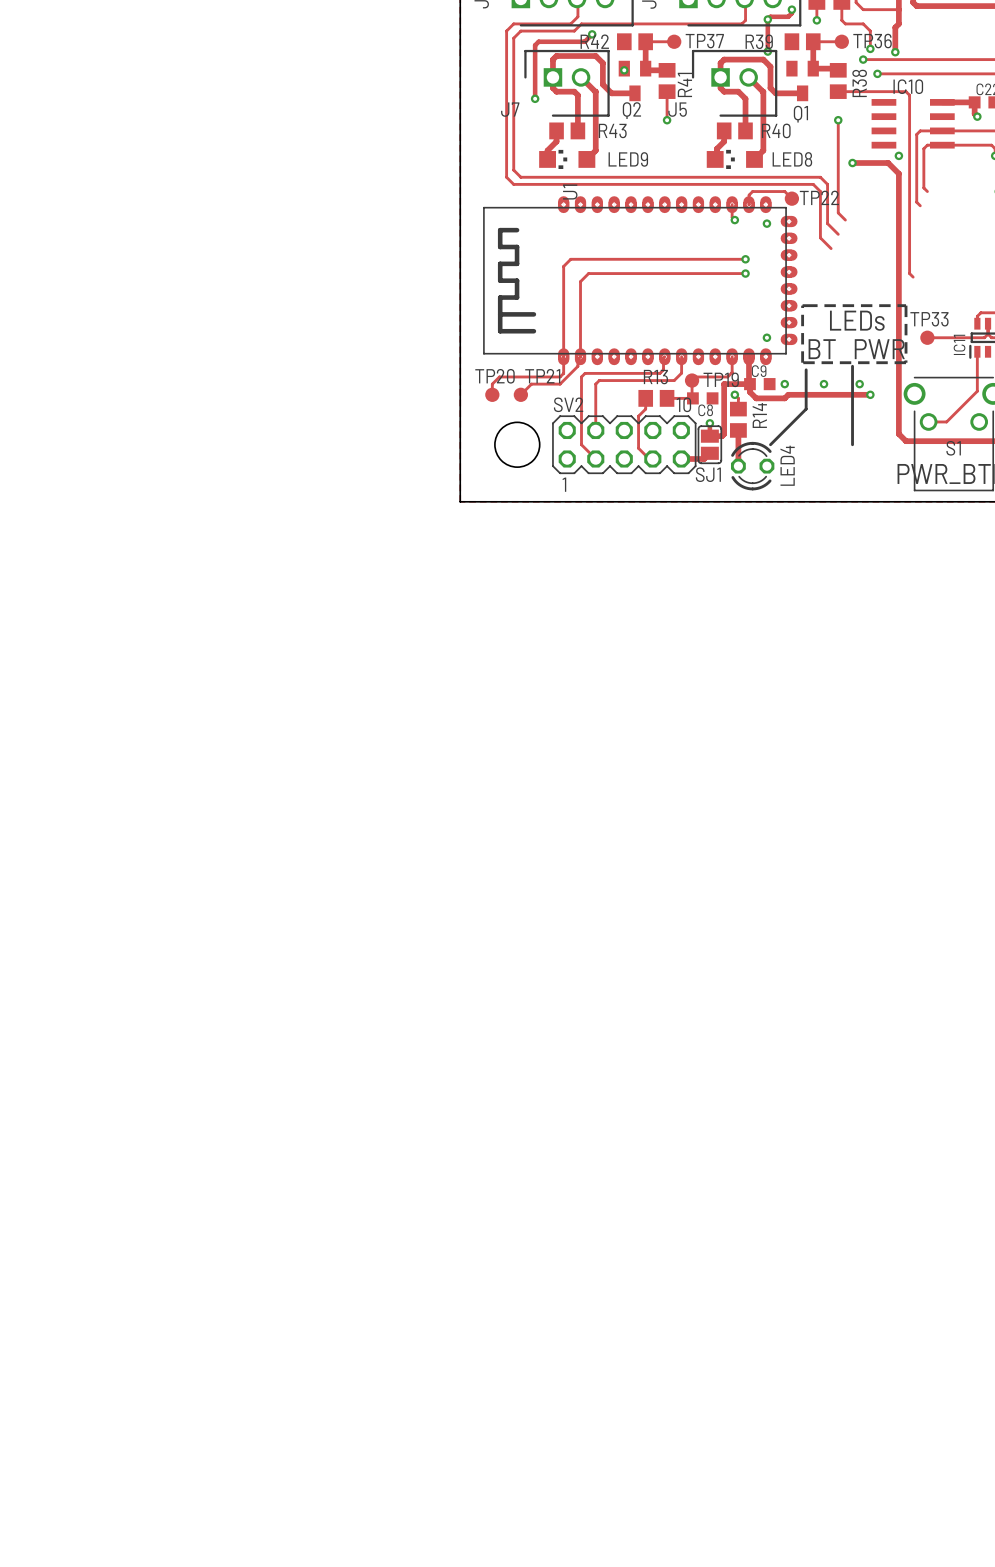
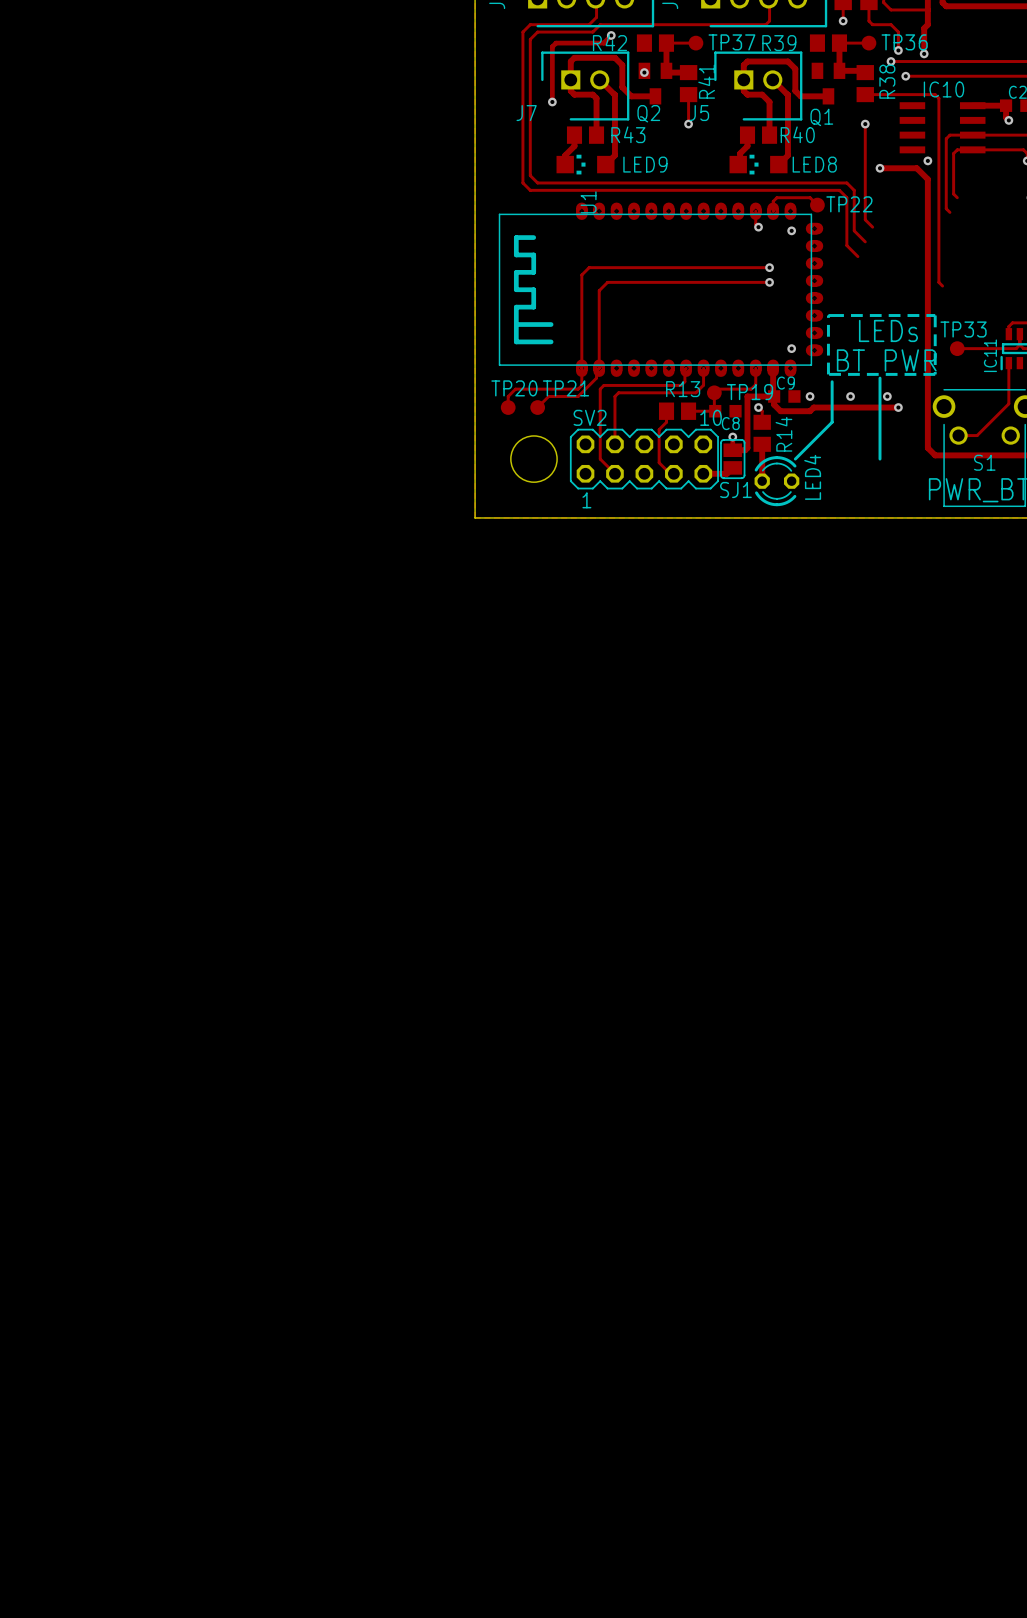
track: (791, 9) (791, 13) (788, 16) (770, 16) (767, 19) (767, 51) -> none
via: (791, 9) -> none
via: (767, 19) -> none
via: (767, 51) -> none

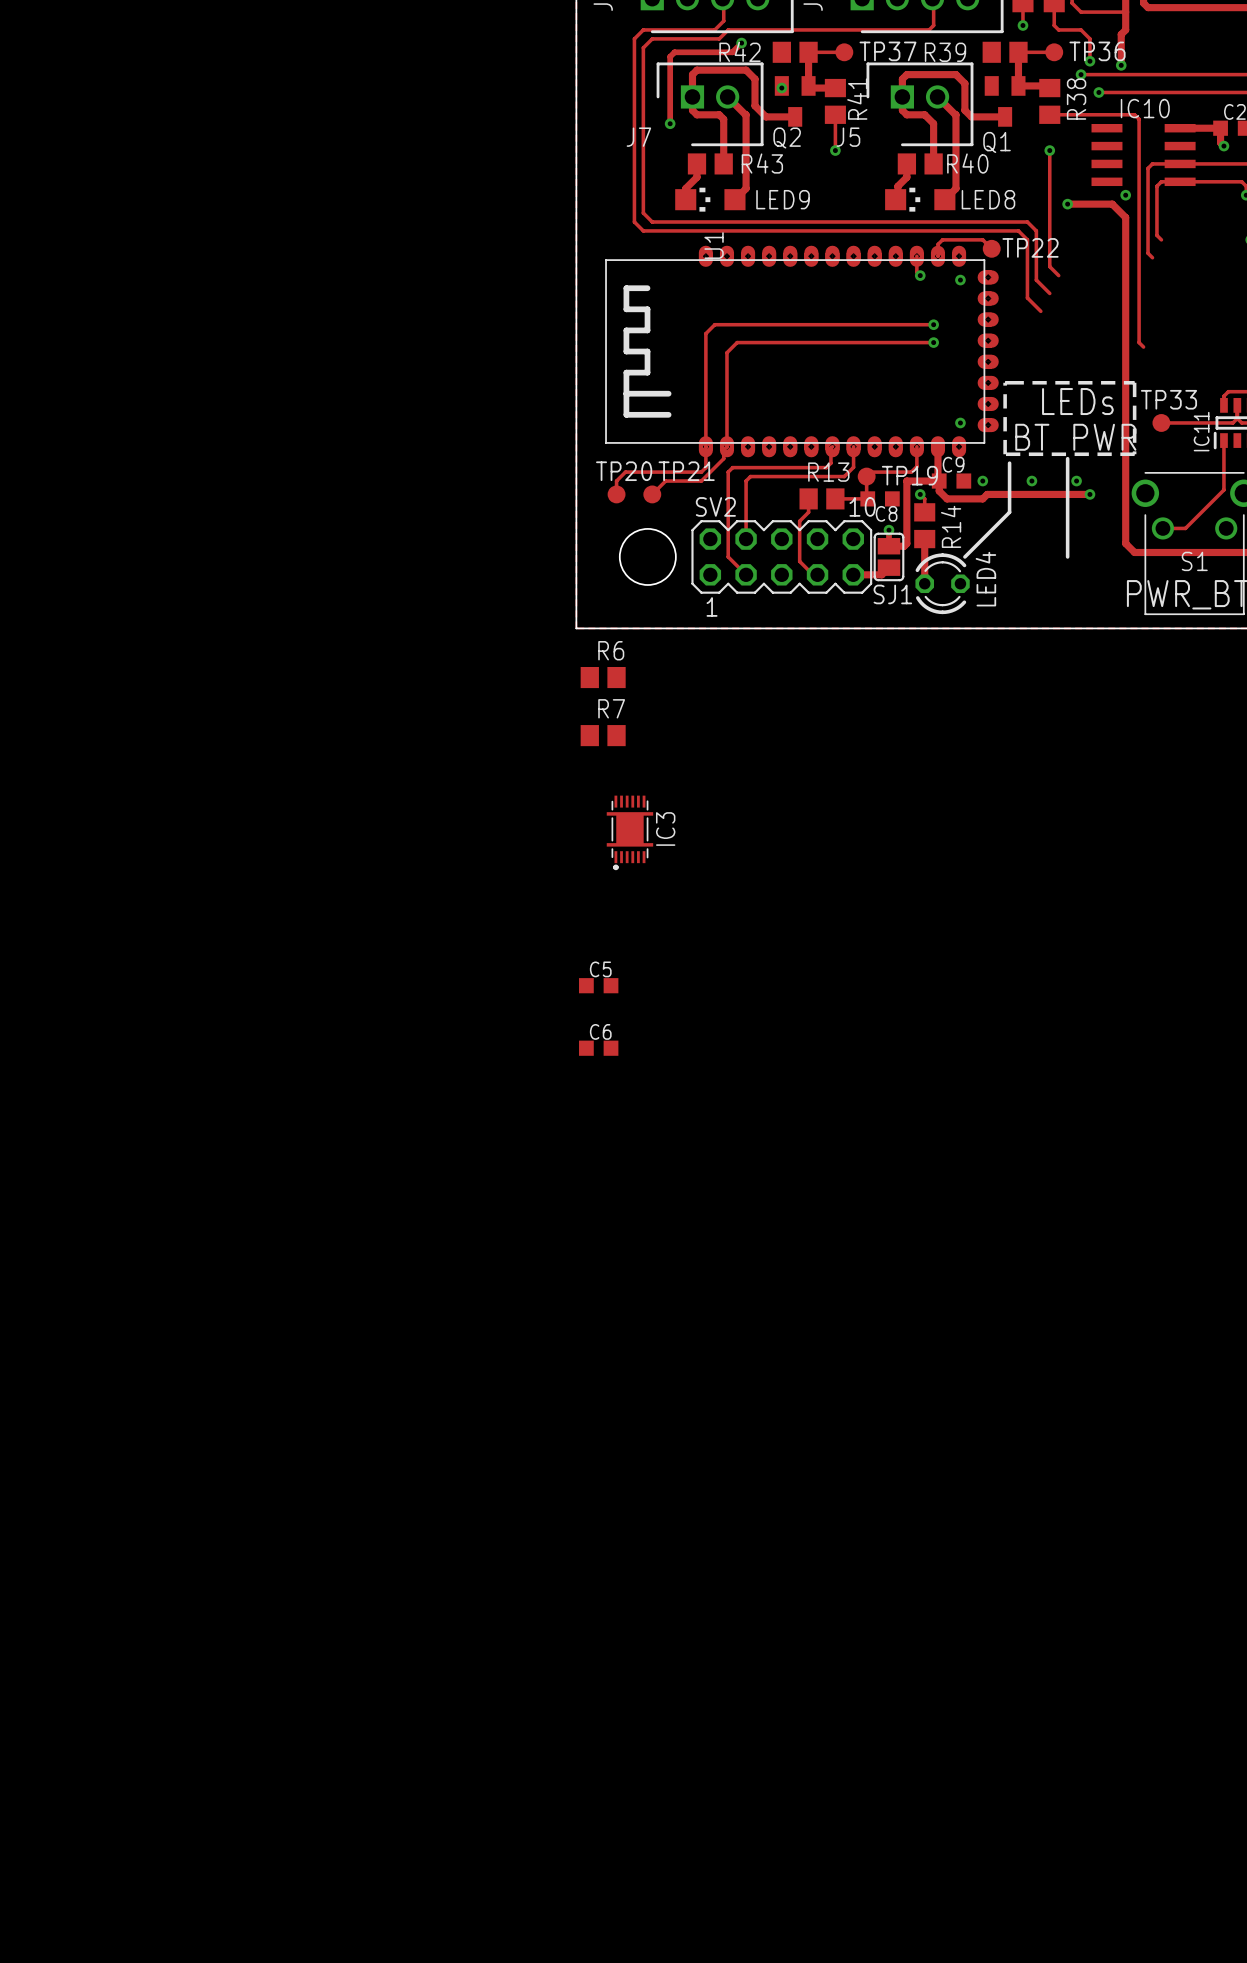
R6: none -> (603, 677)
R7: none -> (603, 735)
IC3: none -> (629, 832)
C5: none -> (598, 985)
C6: none -> (598, 1048)

